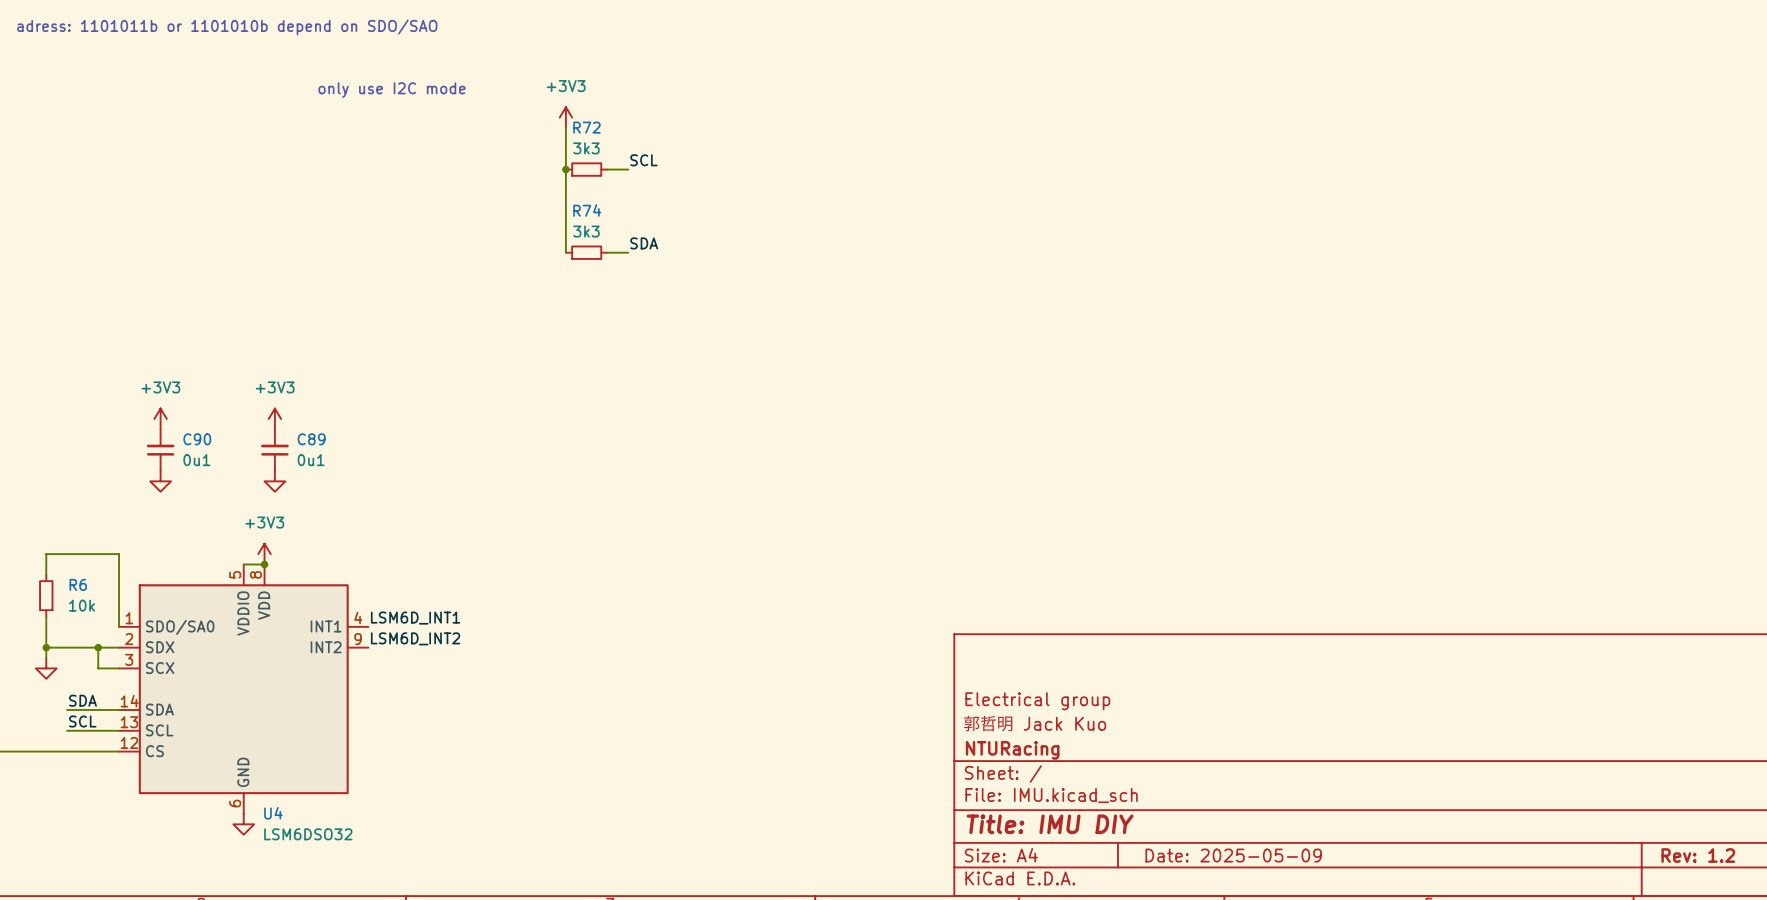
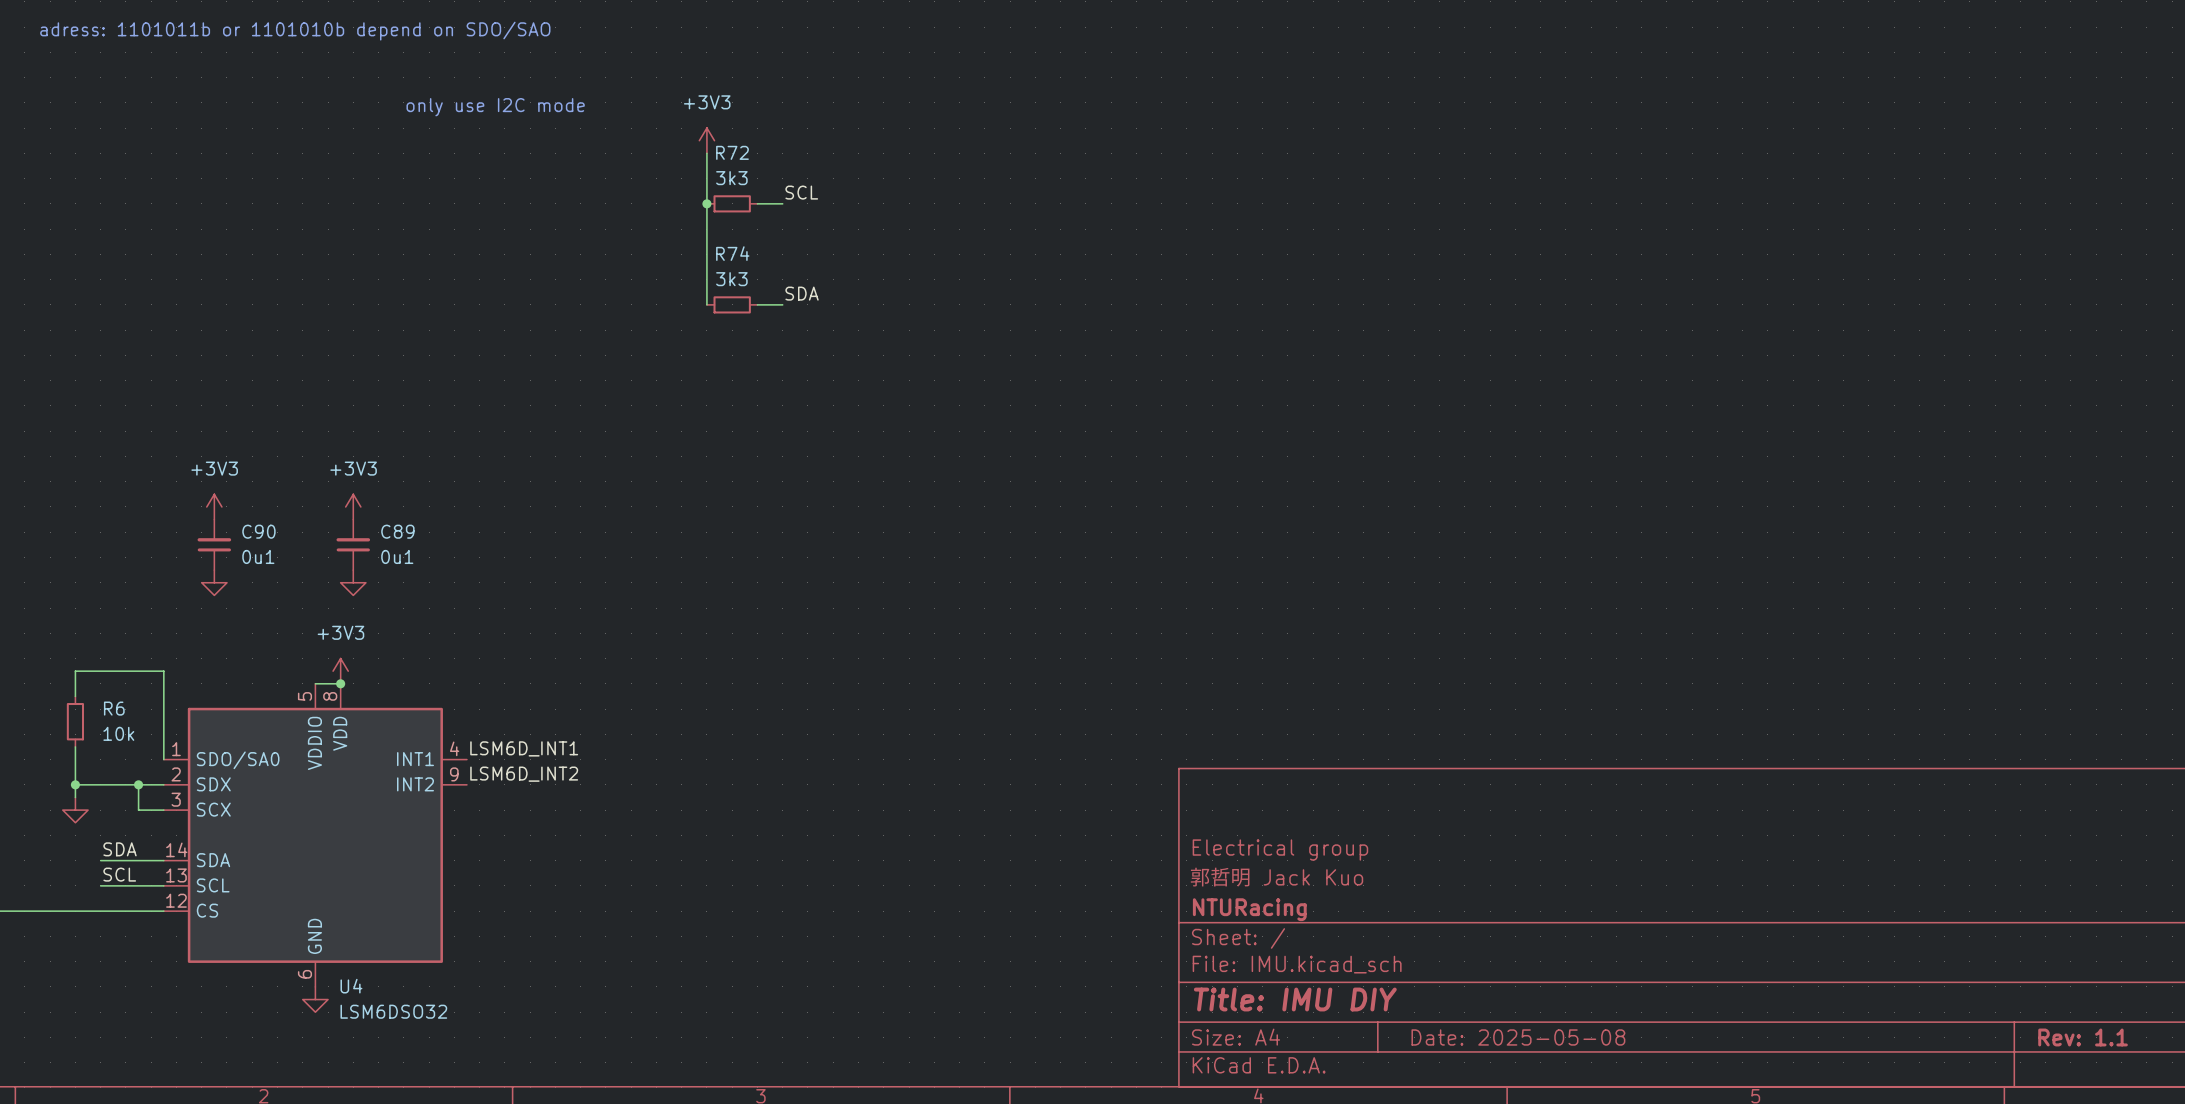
title block: Date: 2025-05-09 (1233, 855) -> Date: 2025-05-08 (1518, 1037)
title block: Rev: 1.2 (1698, 855) -> Rev: 1.1 (2083, 1037)

